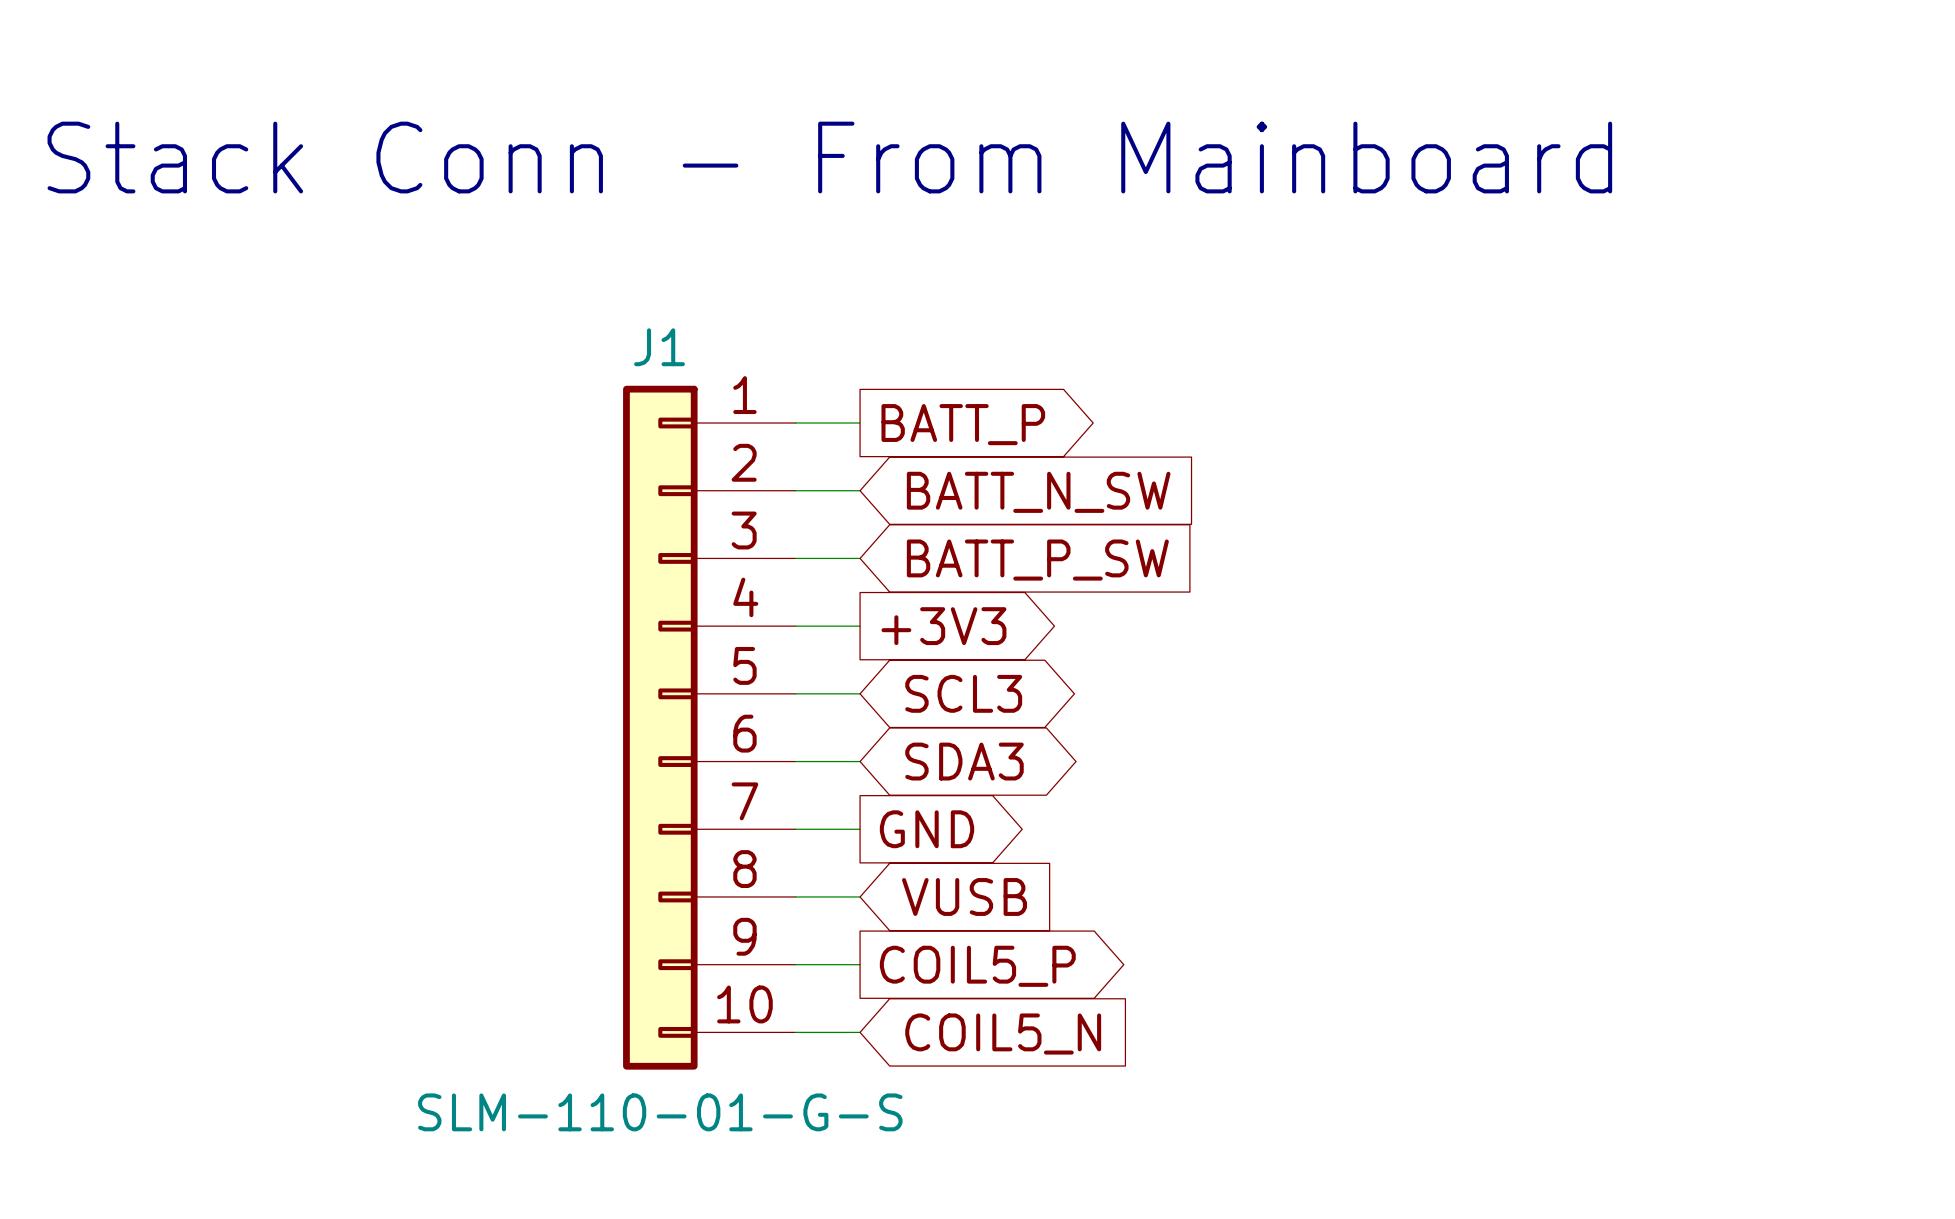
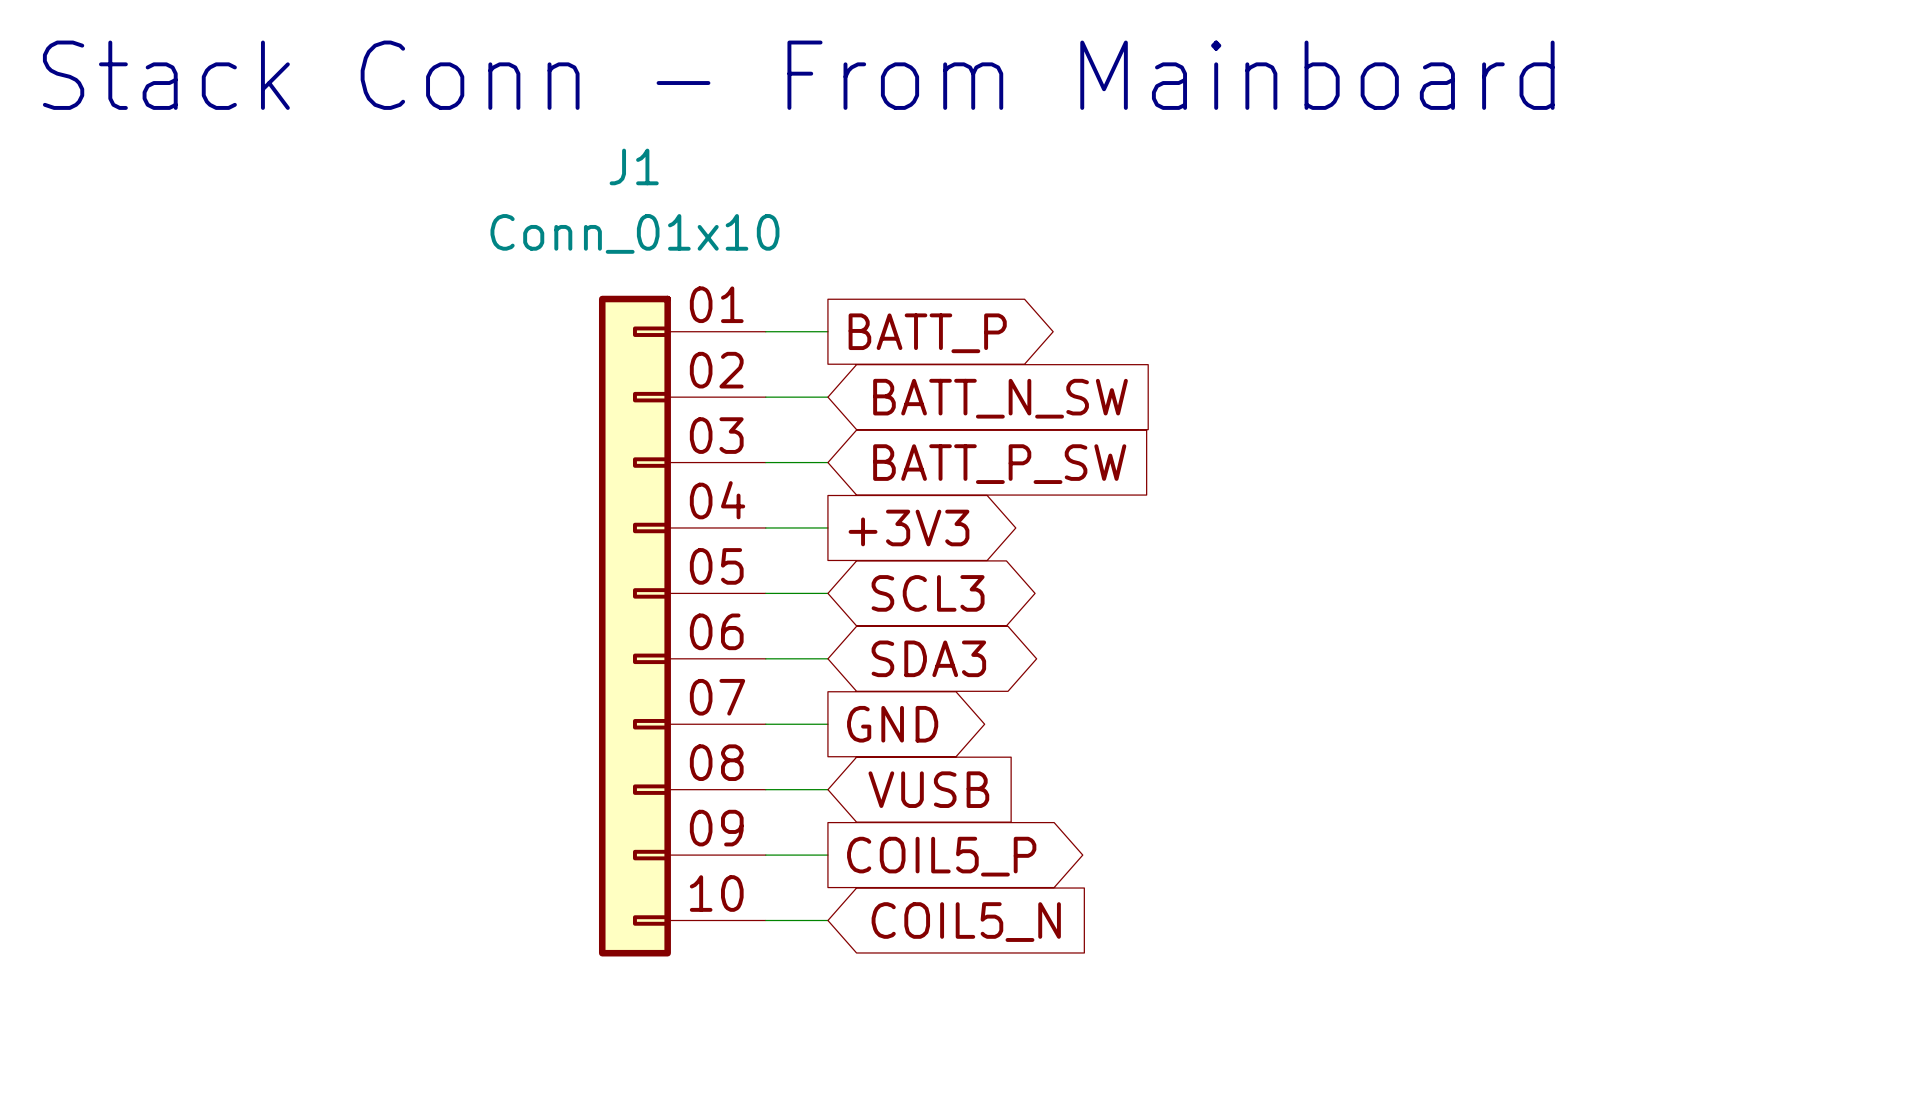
J1 name position: J1 (659, 347) -> J1 (634, 166)
J1 symbol: [623, 385, 796, 1070] -> [598, 295, 766, 957]
J1 value: SLM-110-01-G-S (660, 1112) -> Conn_01x10 (634, 233)

